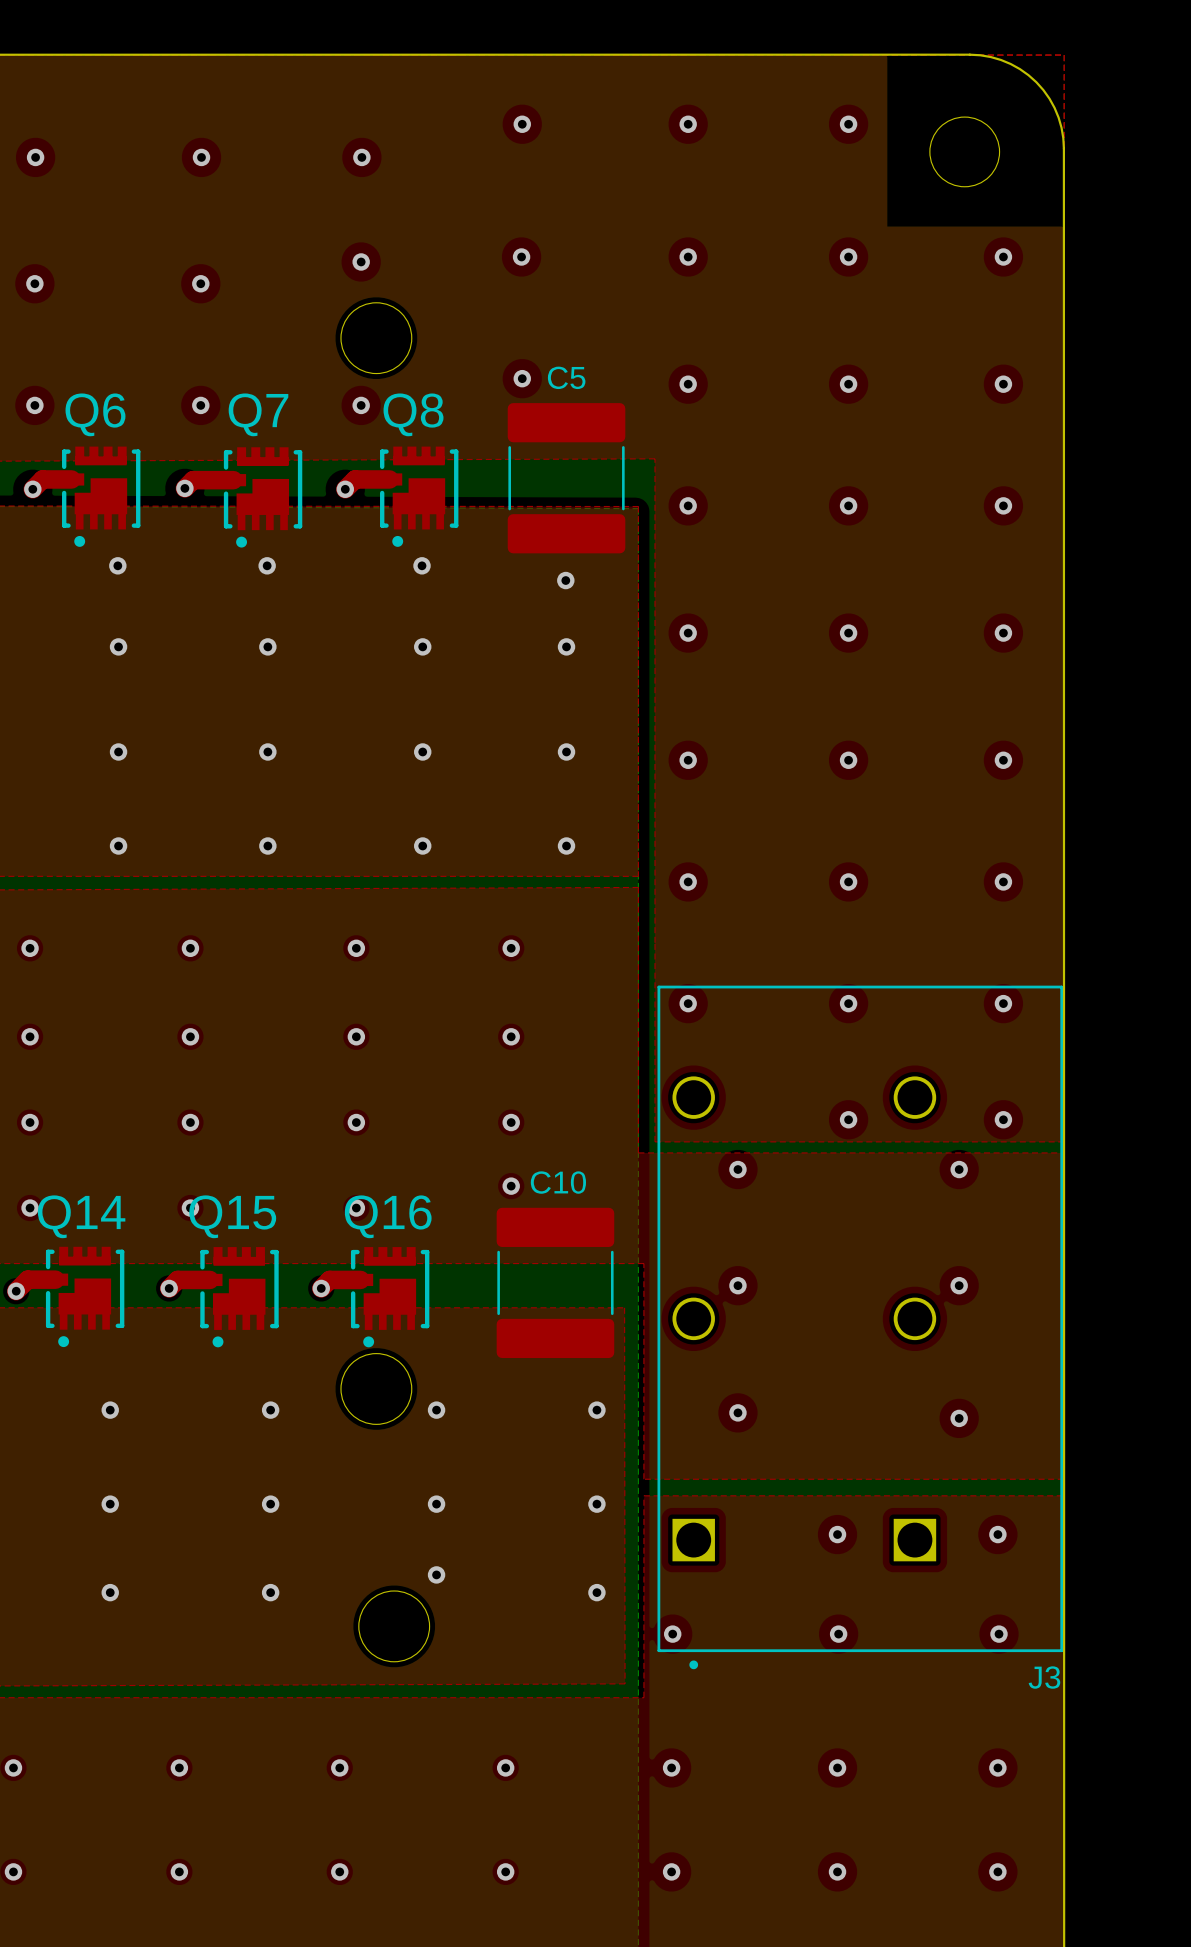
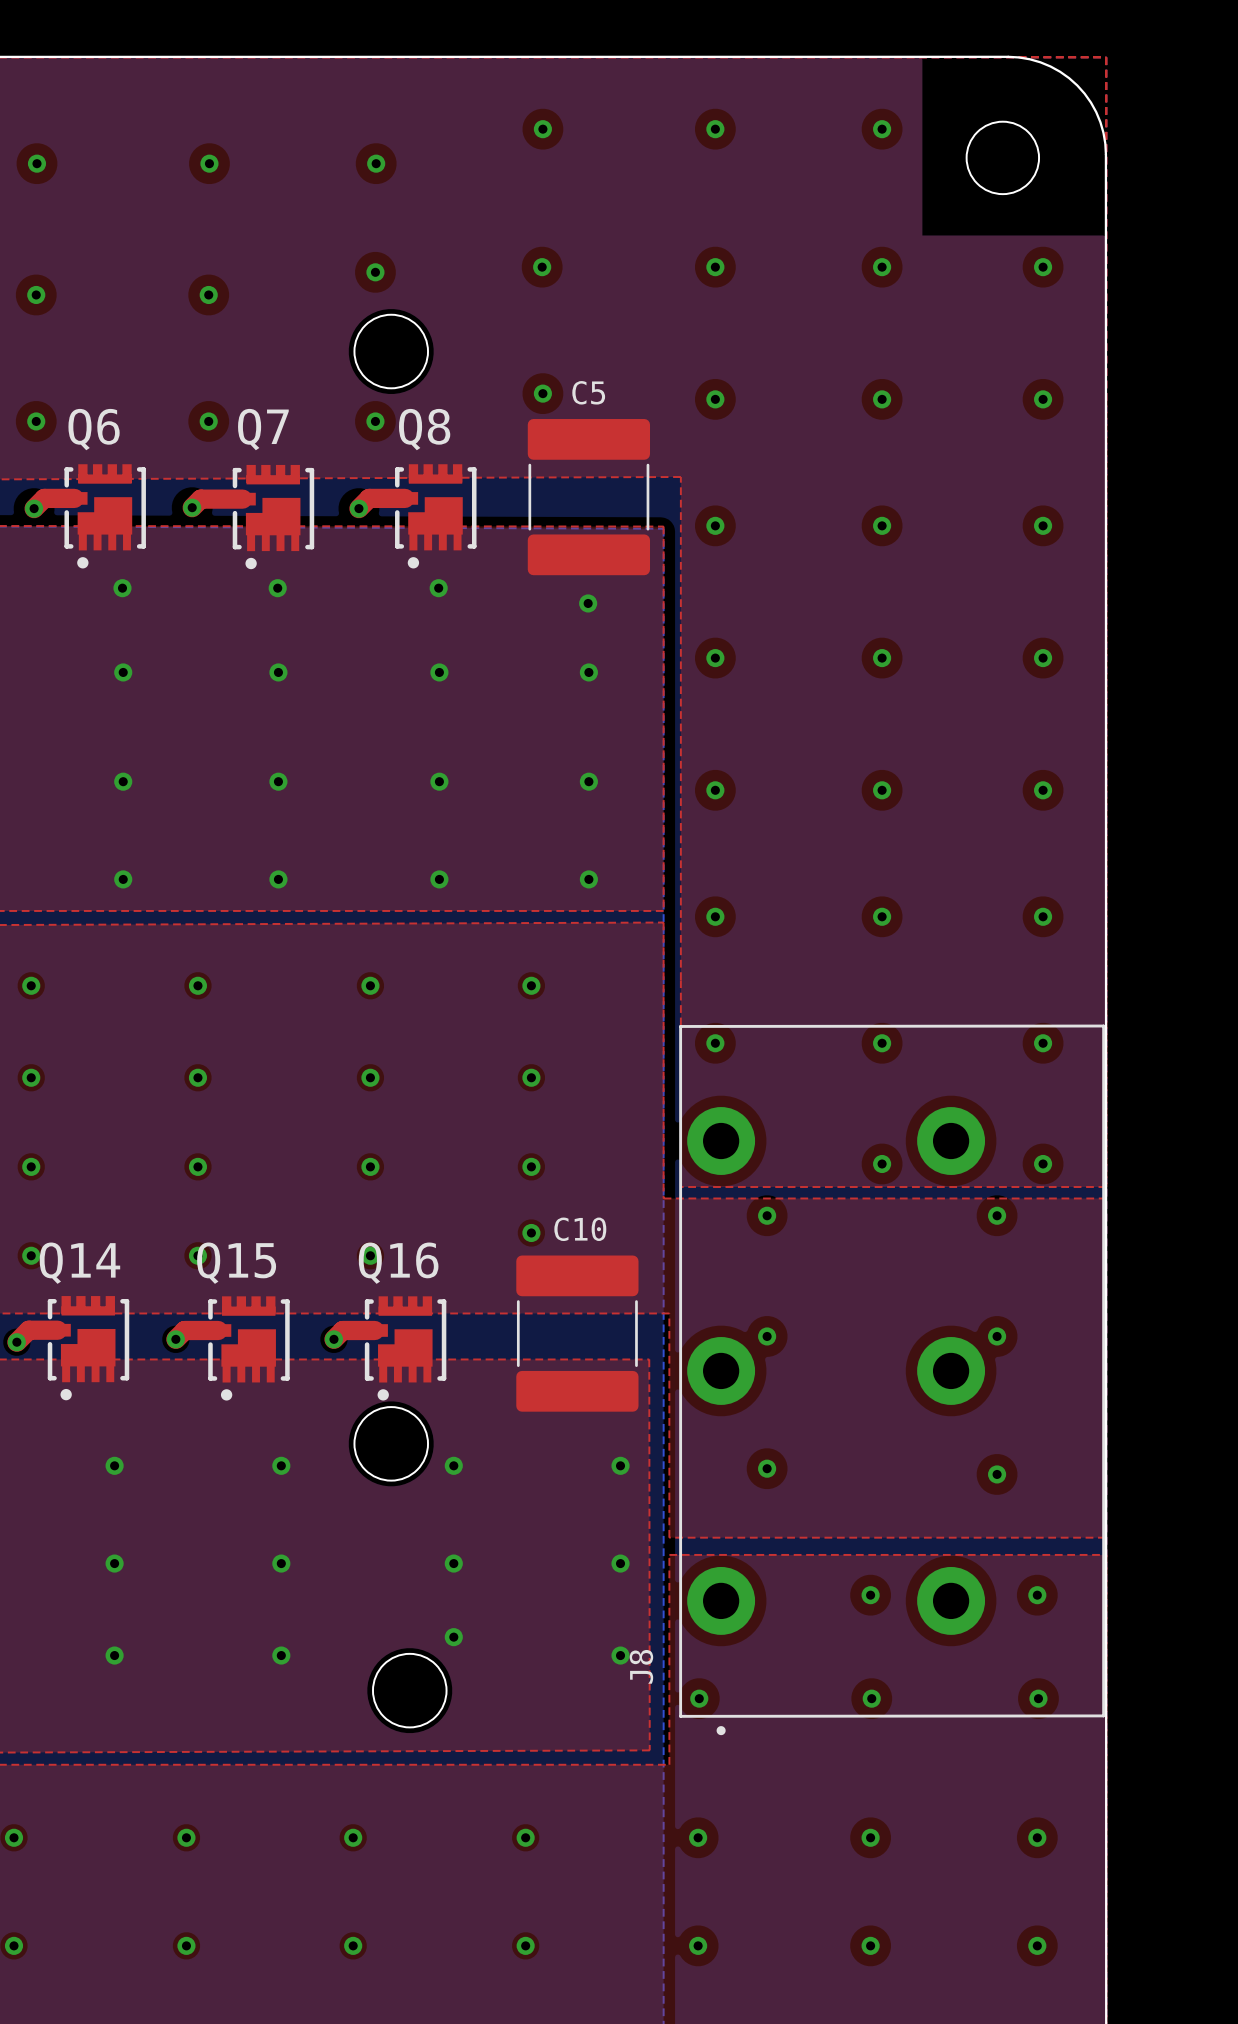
J8: none -> (892, 1379)
J3: (860, 1327) -> none

